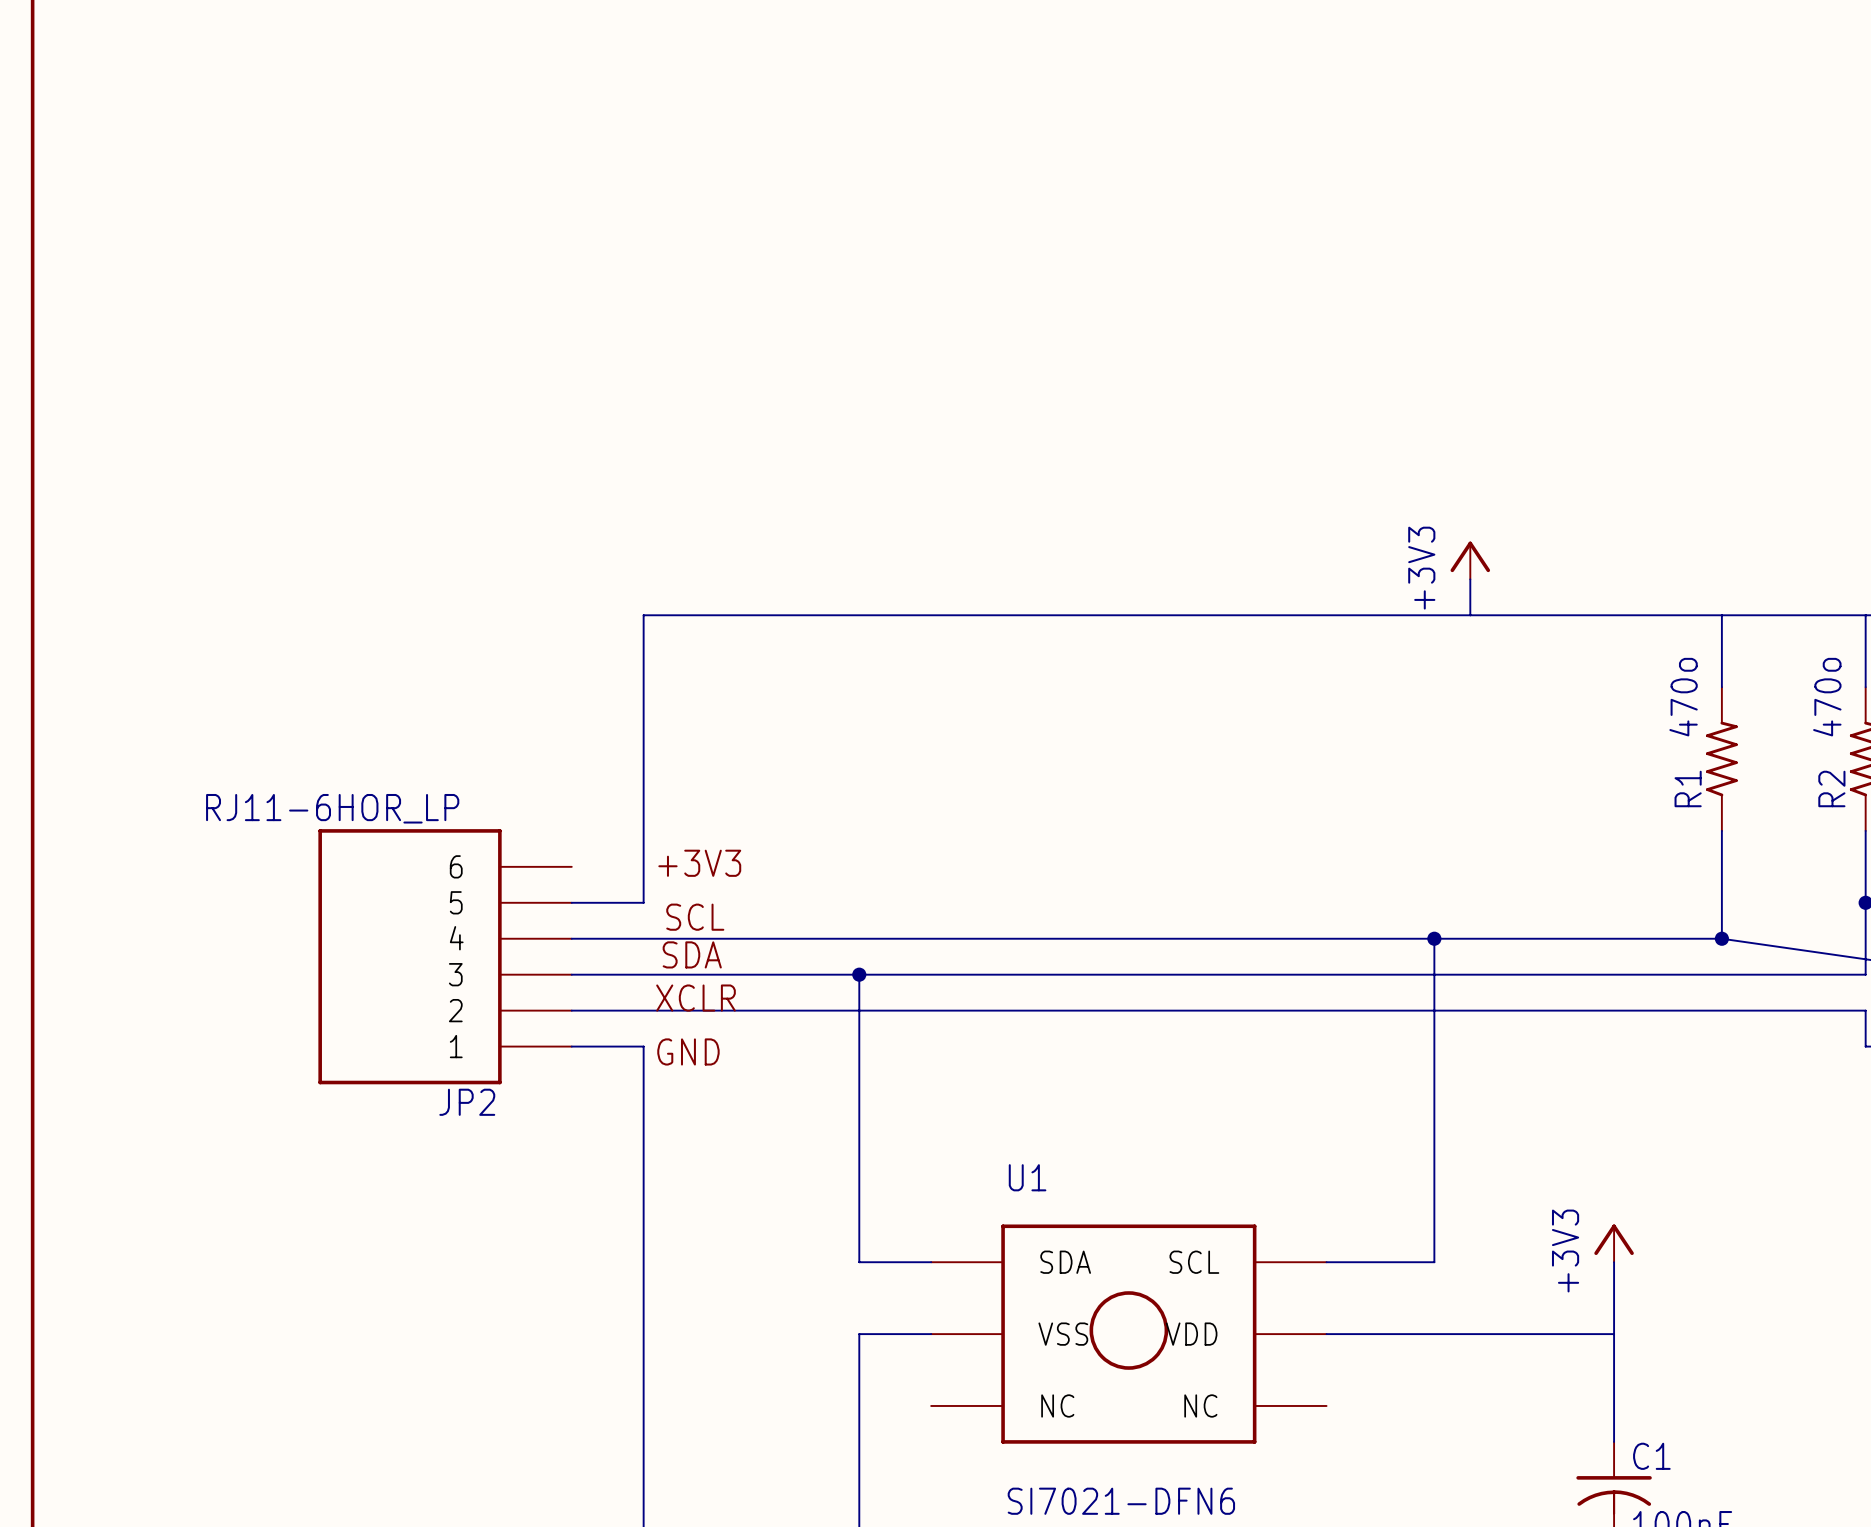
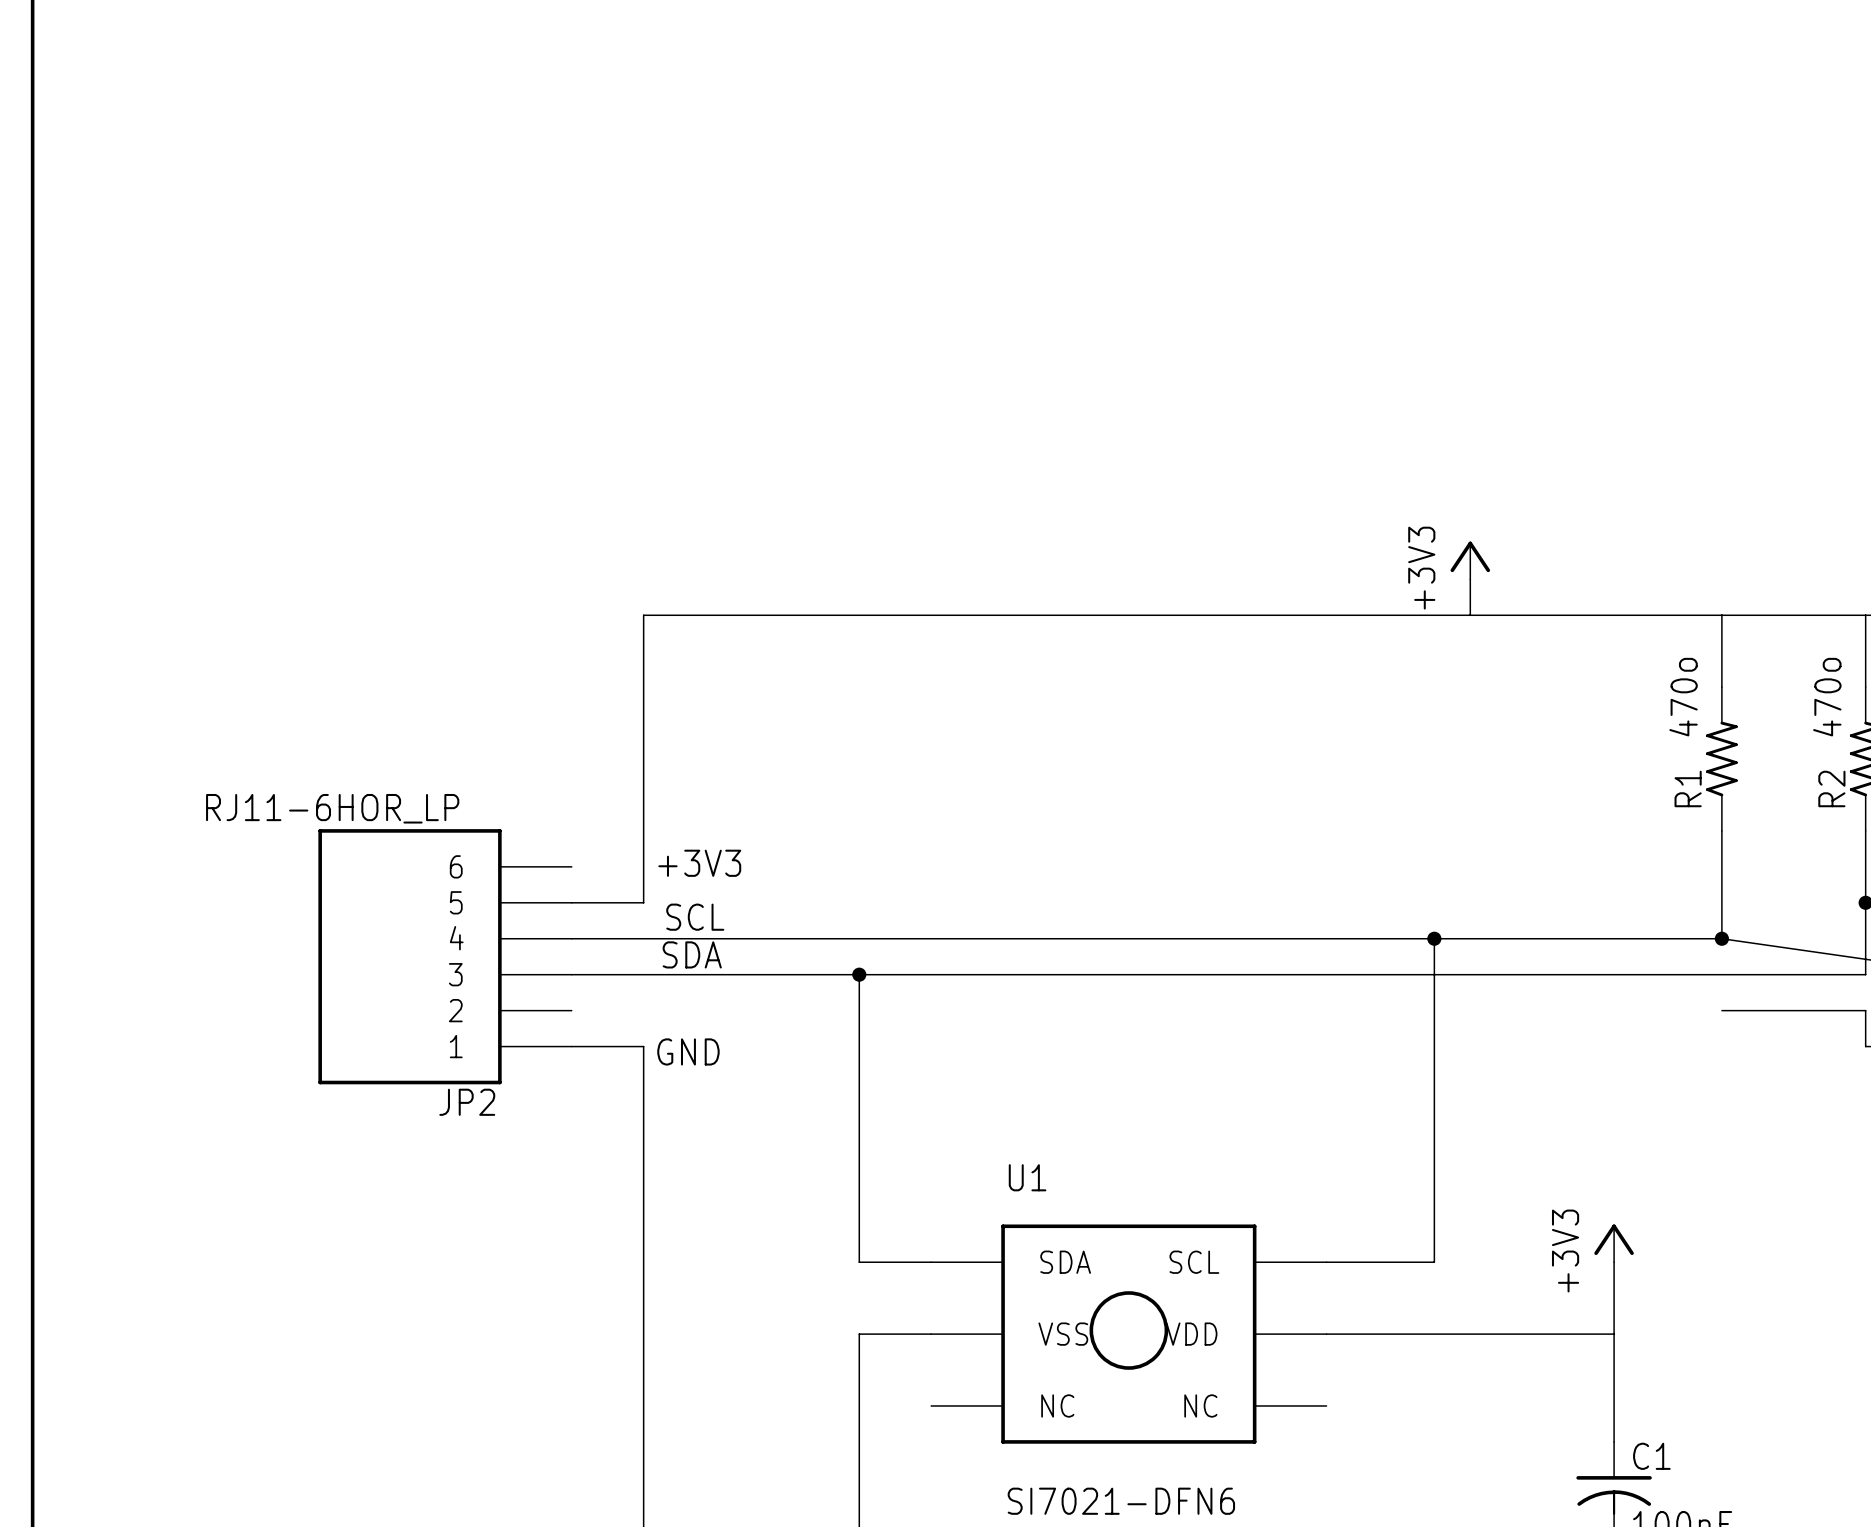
label: XCLR (696, 998) -> none
wire: (571, 1010) (1721, 1010) -> none

